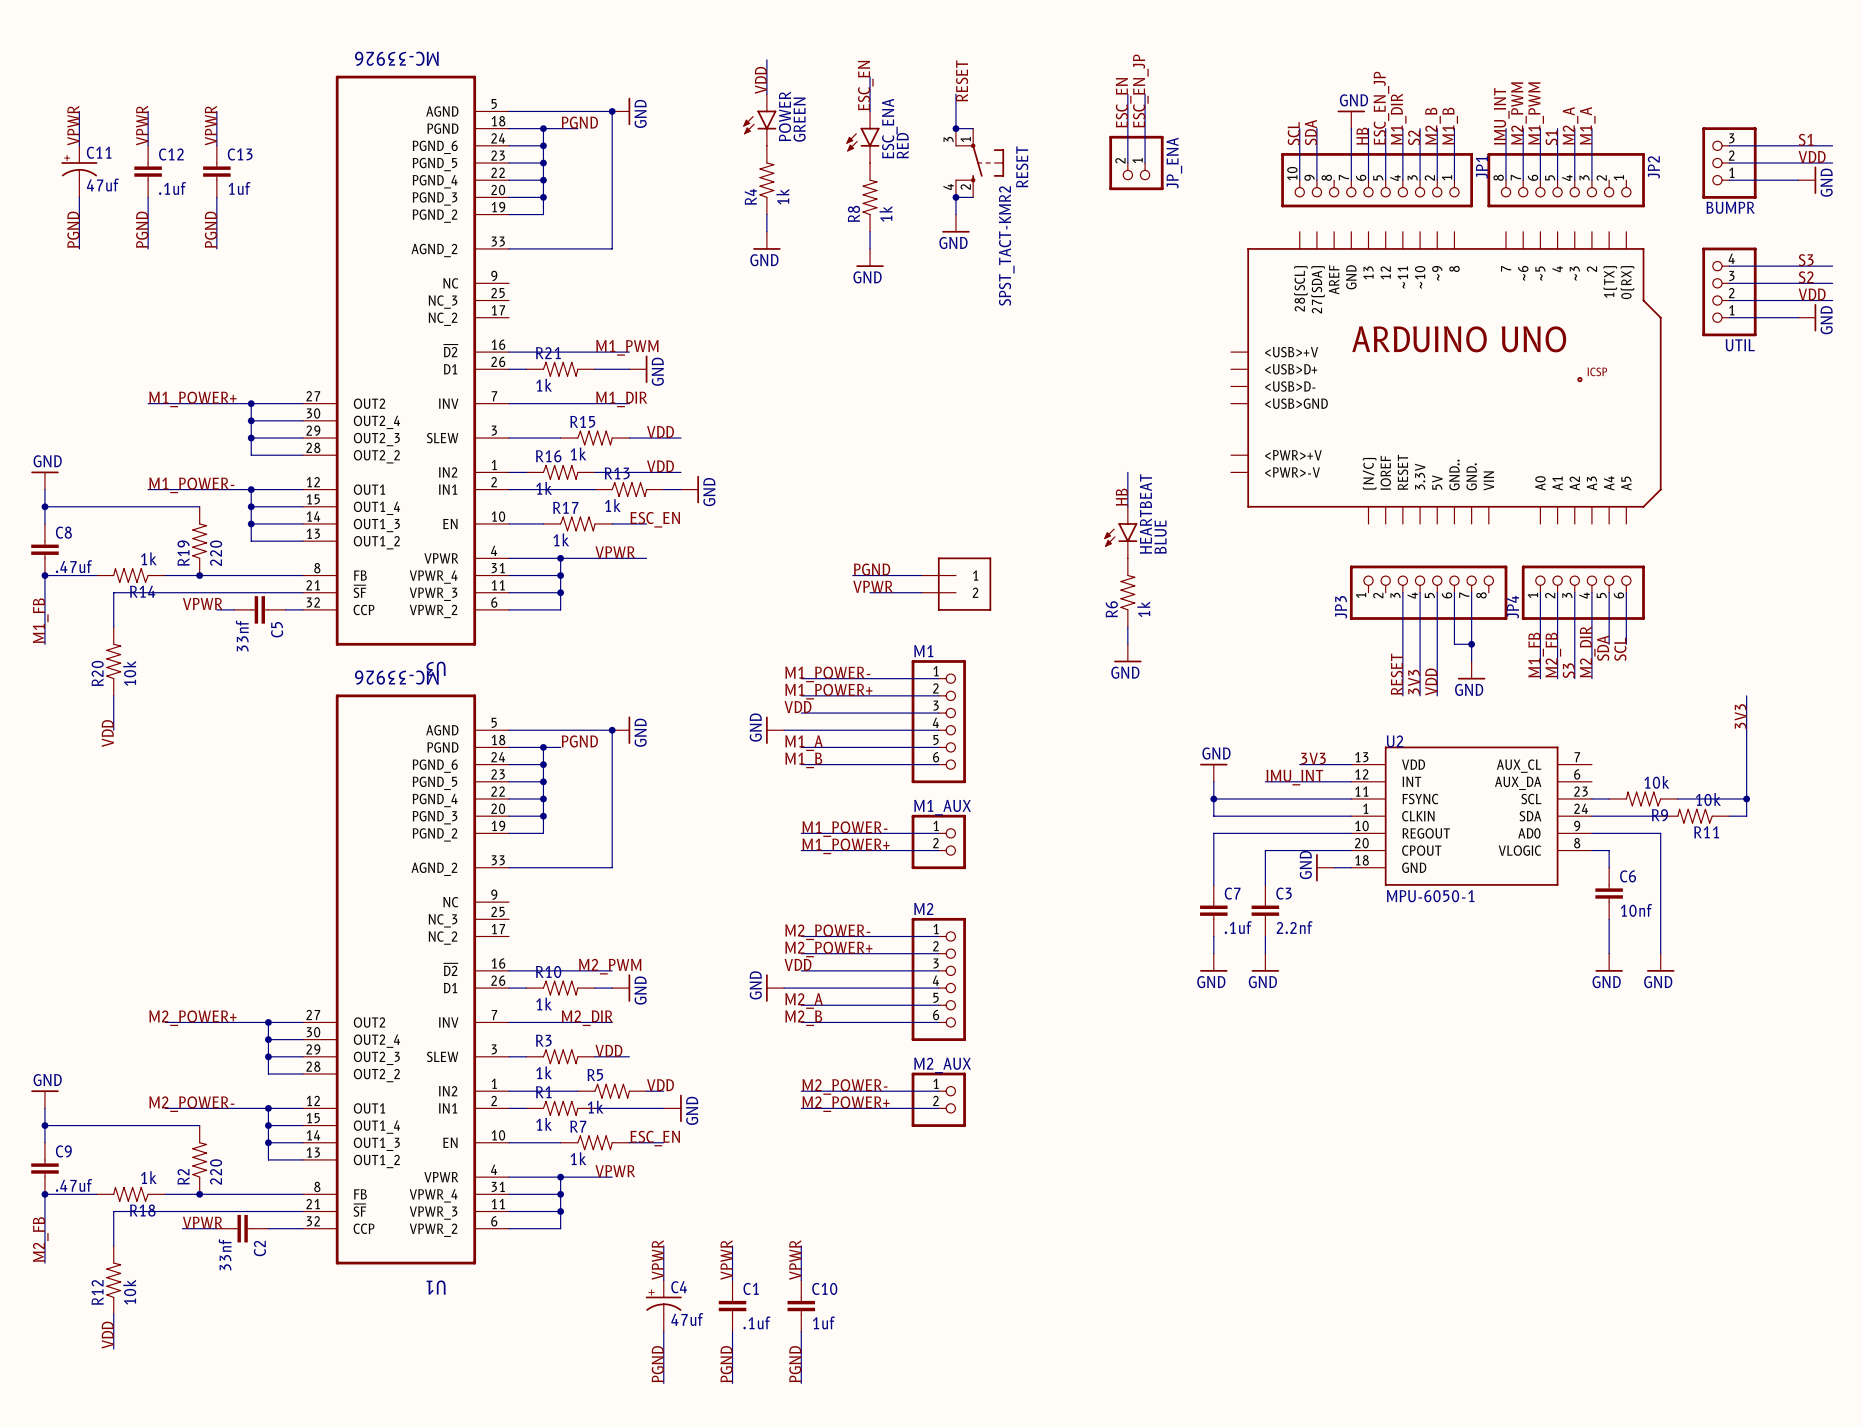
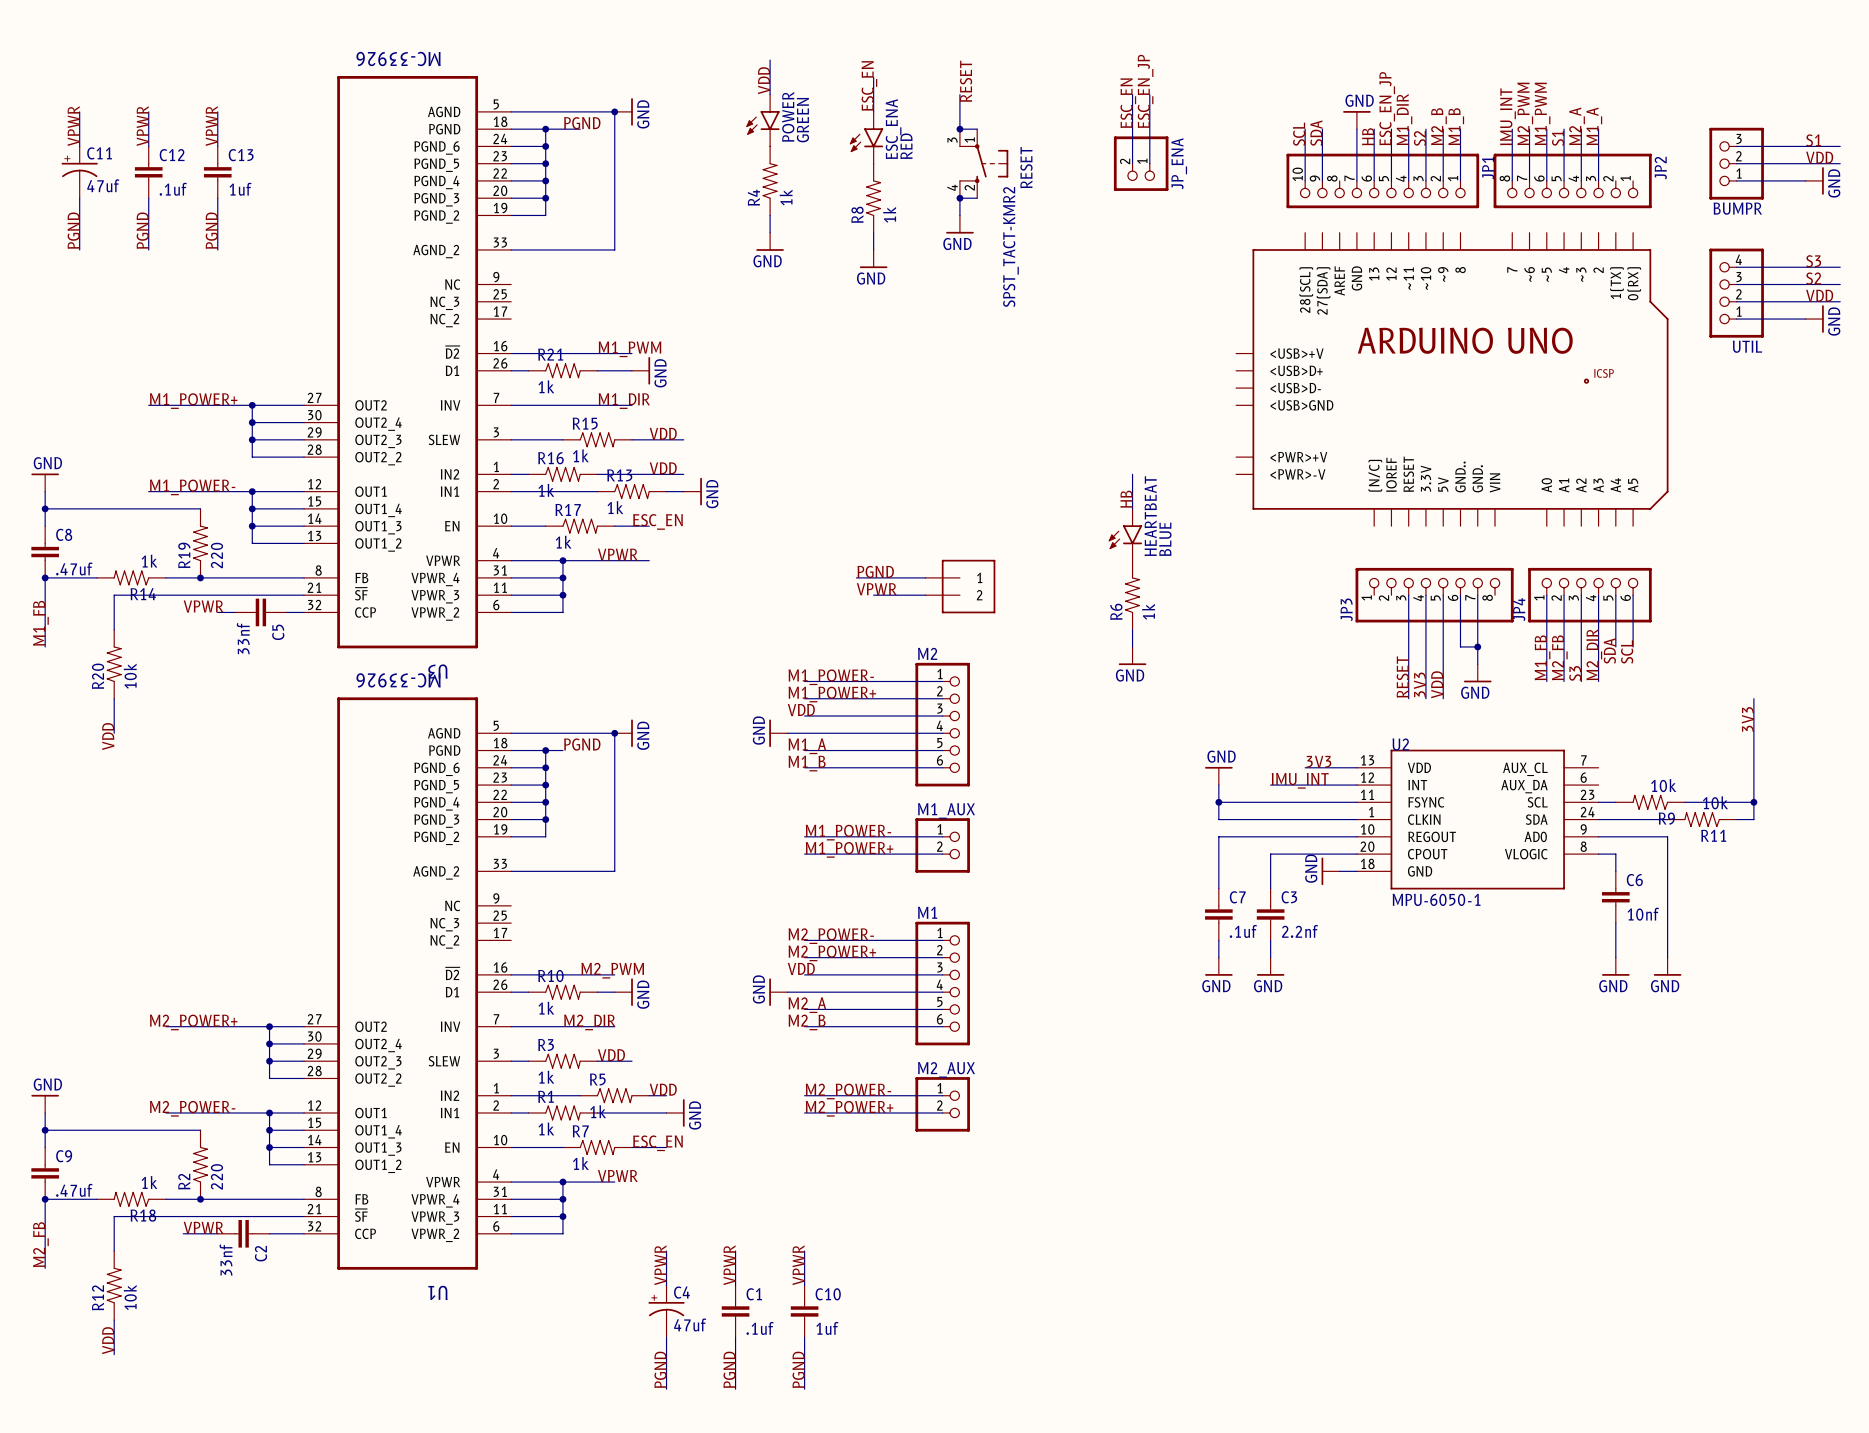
M1 name: M1 (923, 651) -> M2 (927, 653)
M2 name: M2 (923, 908) -> M1 (927, 912)

